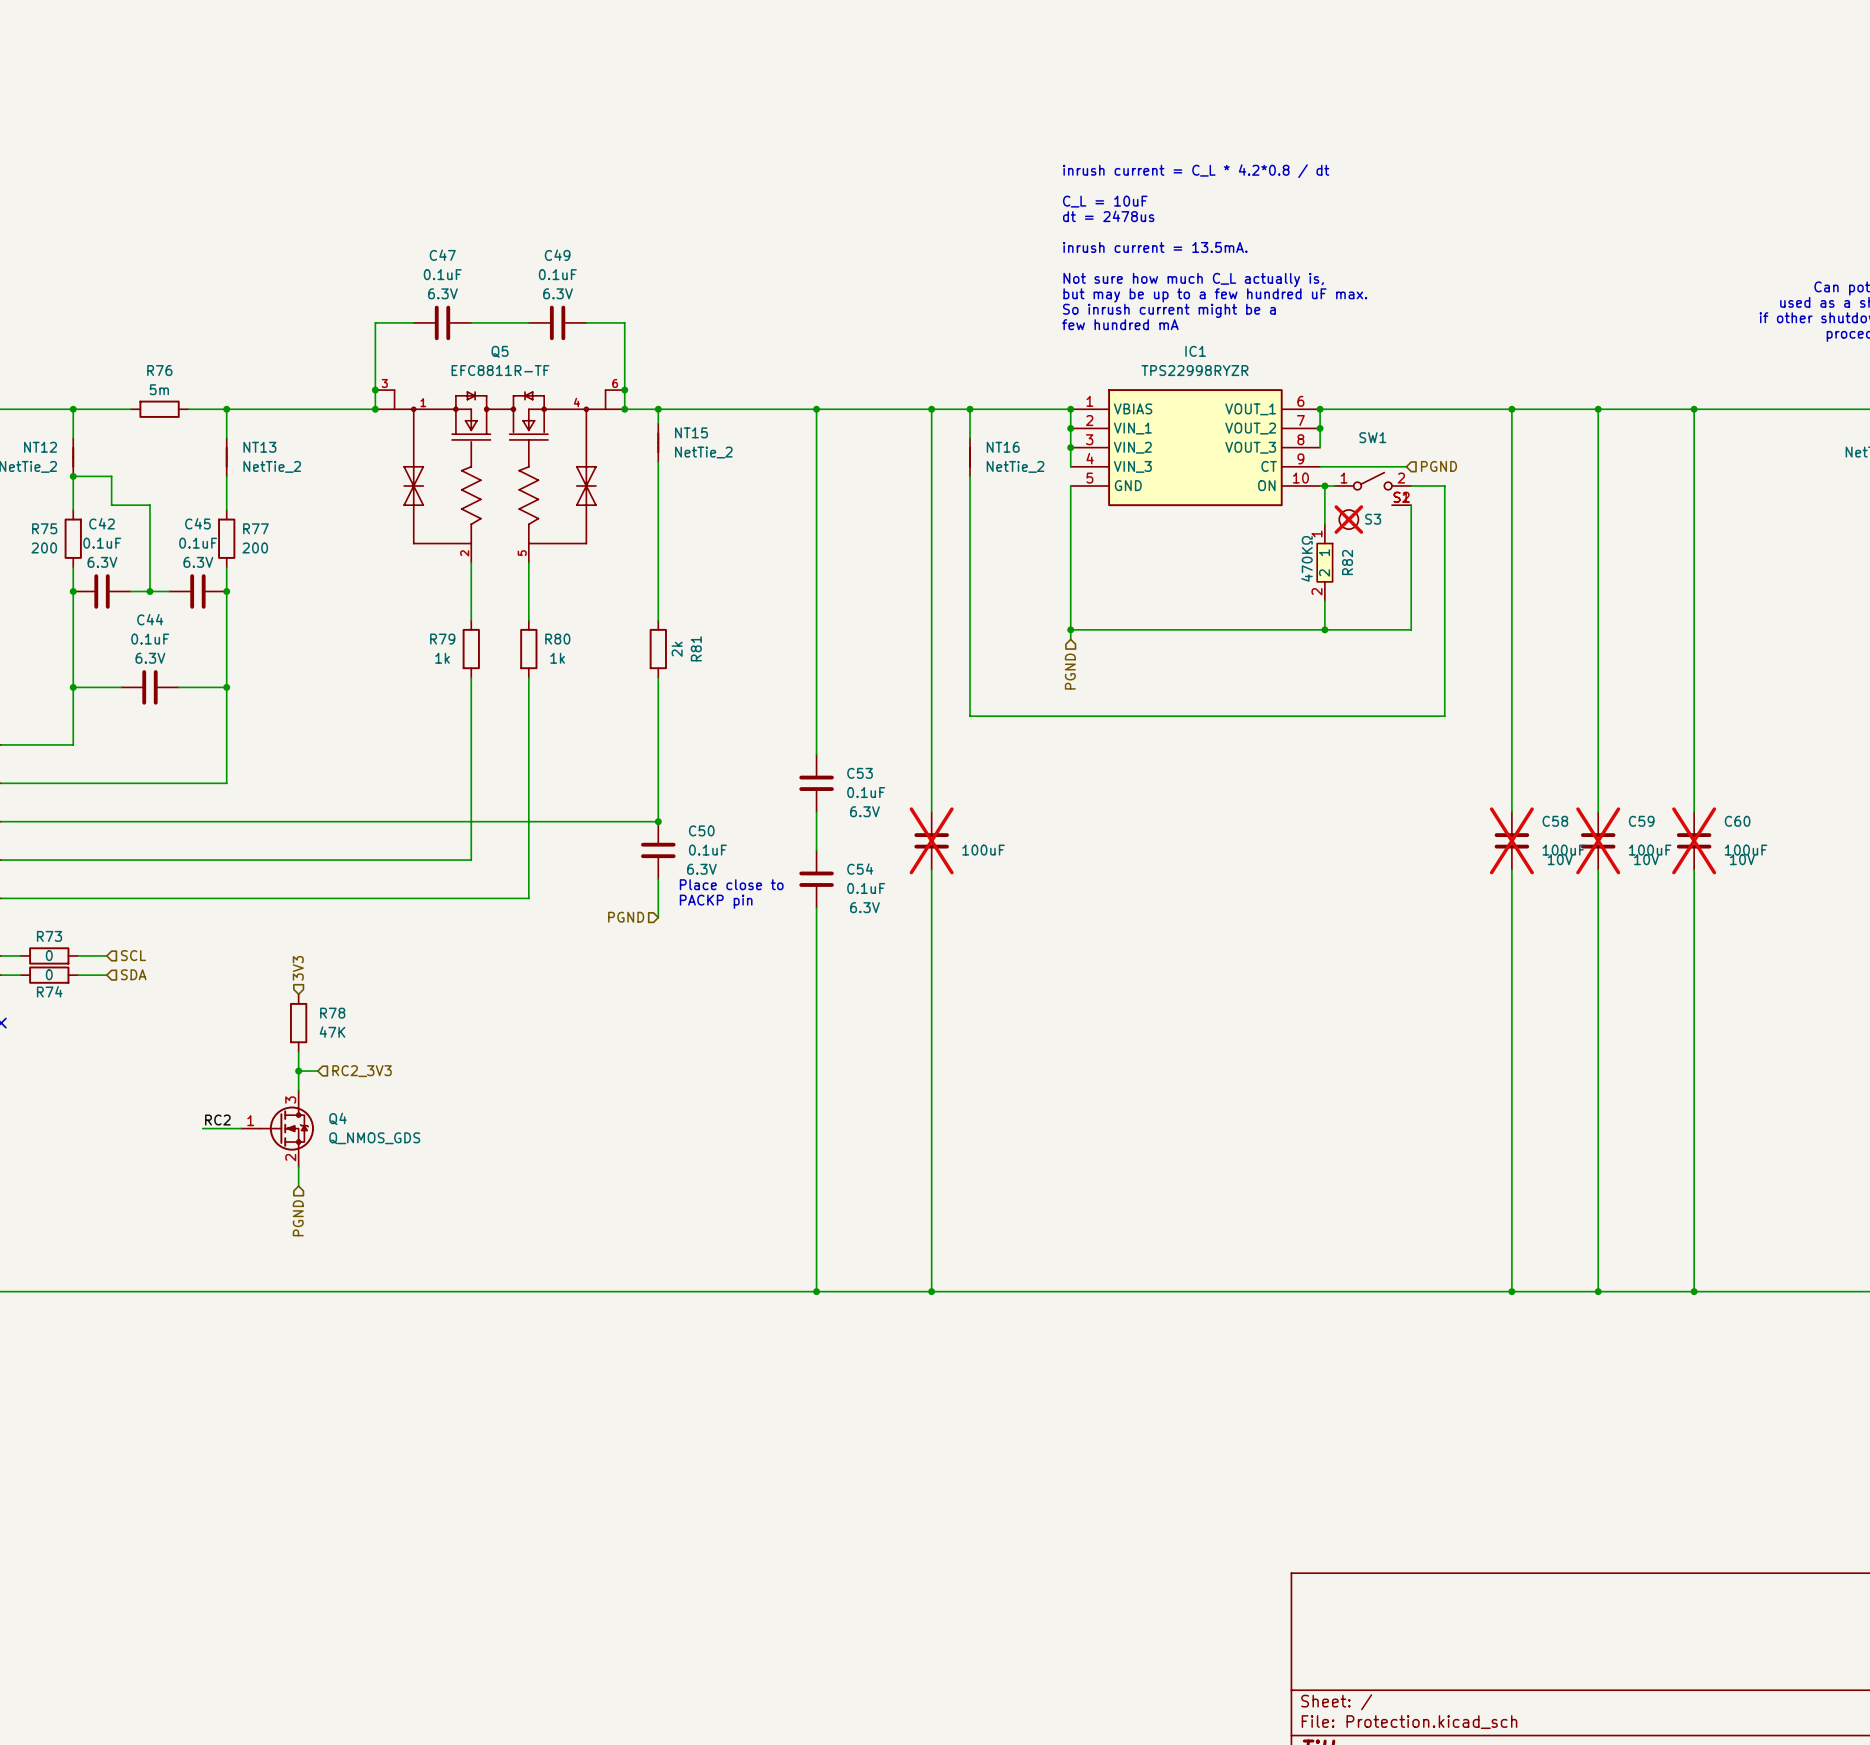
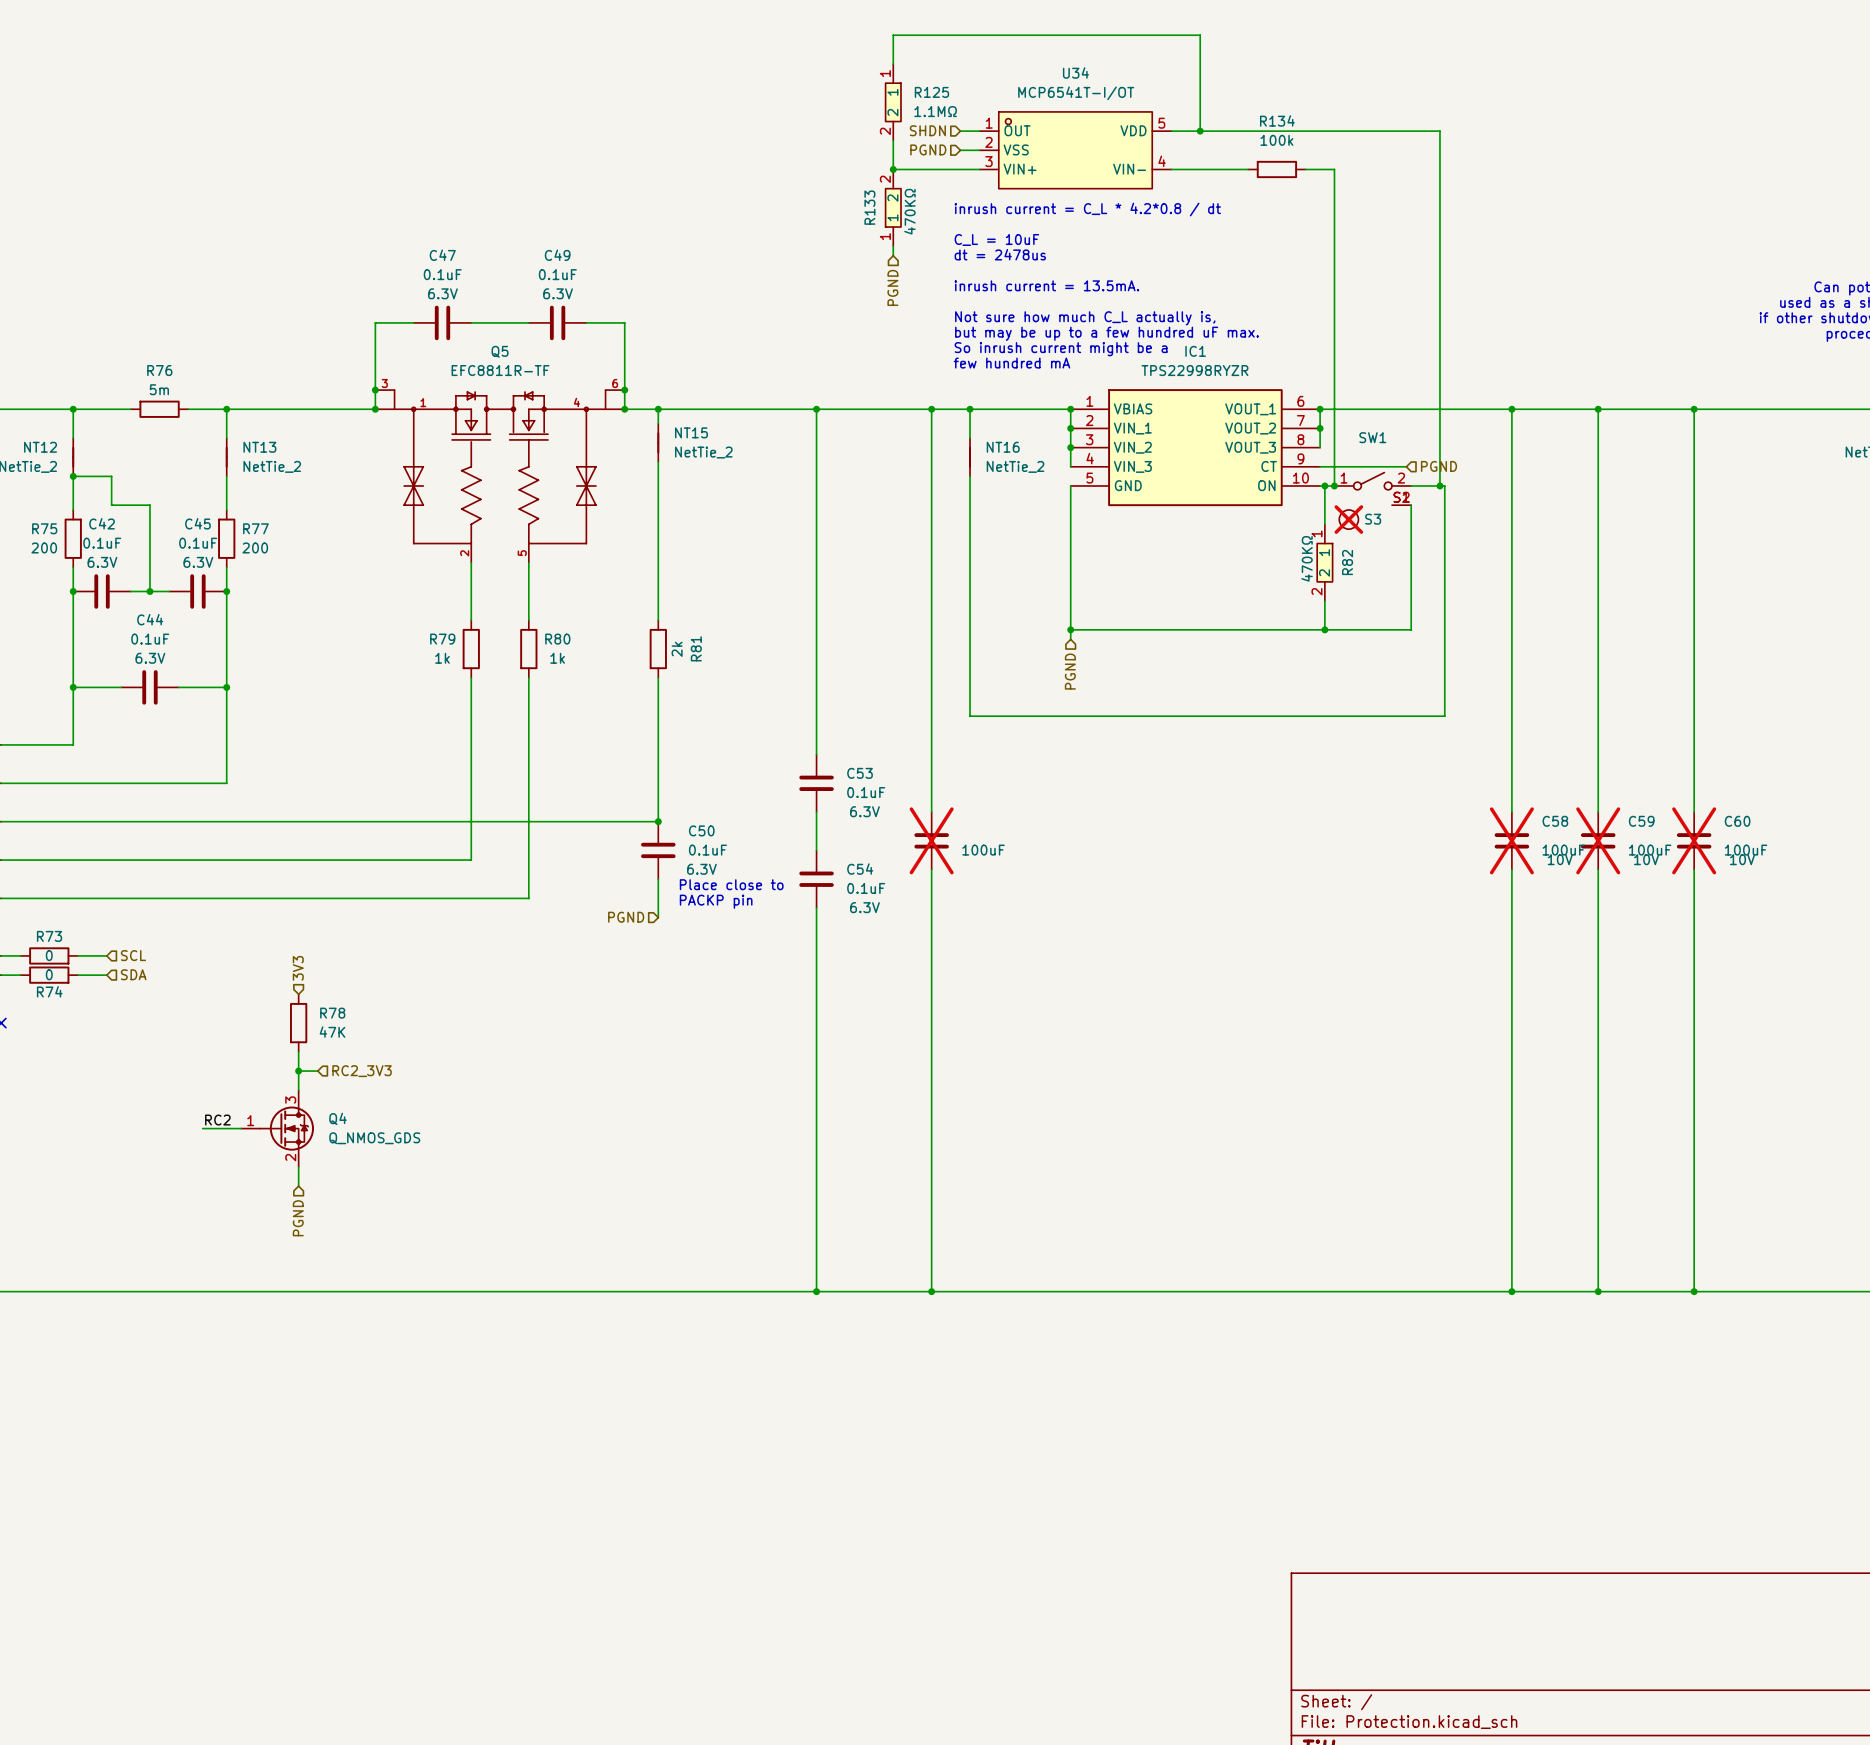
wire: none -> (893, 63) (893, 35) (1200, 35) (1200, 131)
R125: none -> 1.1MΩ (893, 102)
hierarchical label: none -> SHDN (927, 130)
wire: none -> (960, 131) (979, 131)
wire: none -> (1171, 131) (1439, 131) (1439, 485)
junction: none -> (1200, 131)
wire: none -> (893, 140) (893, 169) (979, 169)
hierarchical label: none -> PGND (928, 149)
wire: none -> (960, 150) (979, 150)
U34: none -> MCP6541T-I/OT (1075, 150)
junction: none -> (893, 169)
wire: none -> (1171, 169) (1248, 169)
R134: none -> 100k (1276, 169)
wire: none -> (1305, 169) (1334, 169) (1334, 485)
text position: inrush current = C_L * 4.2*0.8 / dt (1196, 171) -> inrush current = C_L * 4.2*0.8 / dt (1087, 209)
text position: C_L = 10uF (1105, 201) -> C_L = 10uF (996, 239)
R133: none -> (893, 207)
text position: dt = 2478us (1108, 216) -> dt = 2478us (1000, 254)
wire: none -> (893, 246) (893, 255)
text position: inrush current = 13.5mA. (1155, 247) -> inrush current = 13.5mA. (1046, 285)
text position: Not sure how much C_L actually is, (1193, 279) -> Not sure how much C_L actually is, (1085, 318)
hierarchical label: none -> PGND (892, 287)
text position: but may be up to a few hundred uF max. (1215, 295) -> but may be up to a few hundred uF max. (1106, 333)
text position: So inrush current might be a (1169, 310) -> So inrush current might be a (1061, 349)
text position: few hundred mA (1120, 324) -> few hundred mA (1011, 363)
junction: none -> (1334, 485)
junction: none -> (1439, 485)

